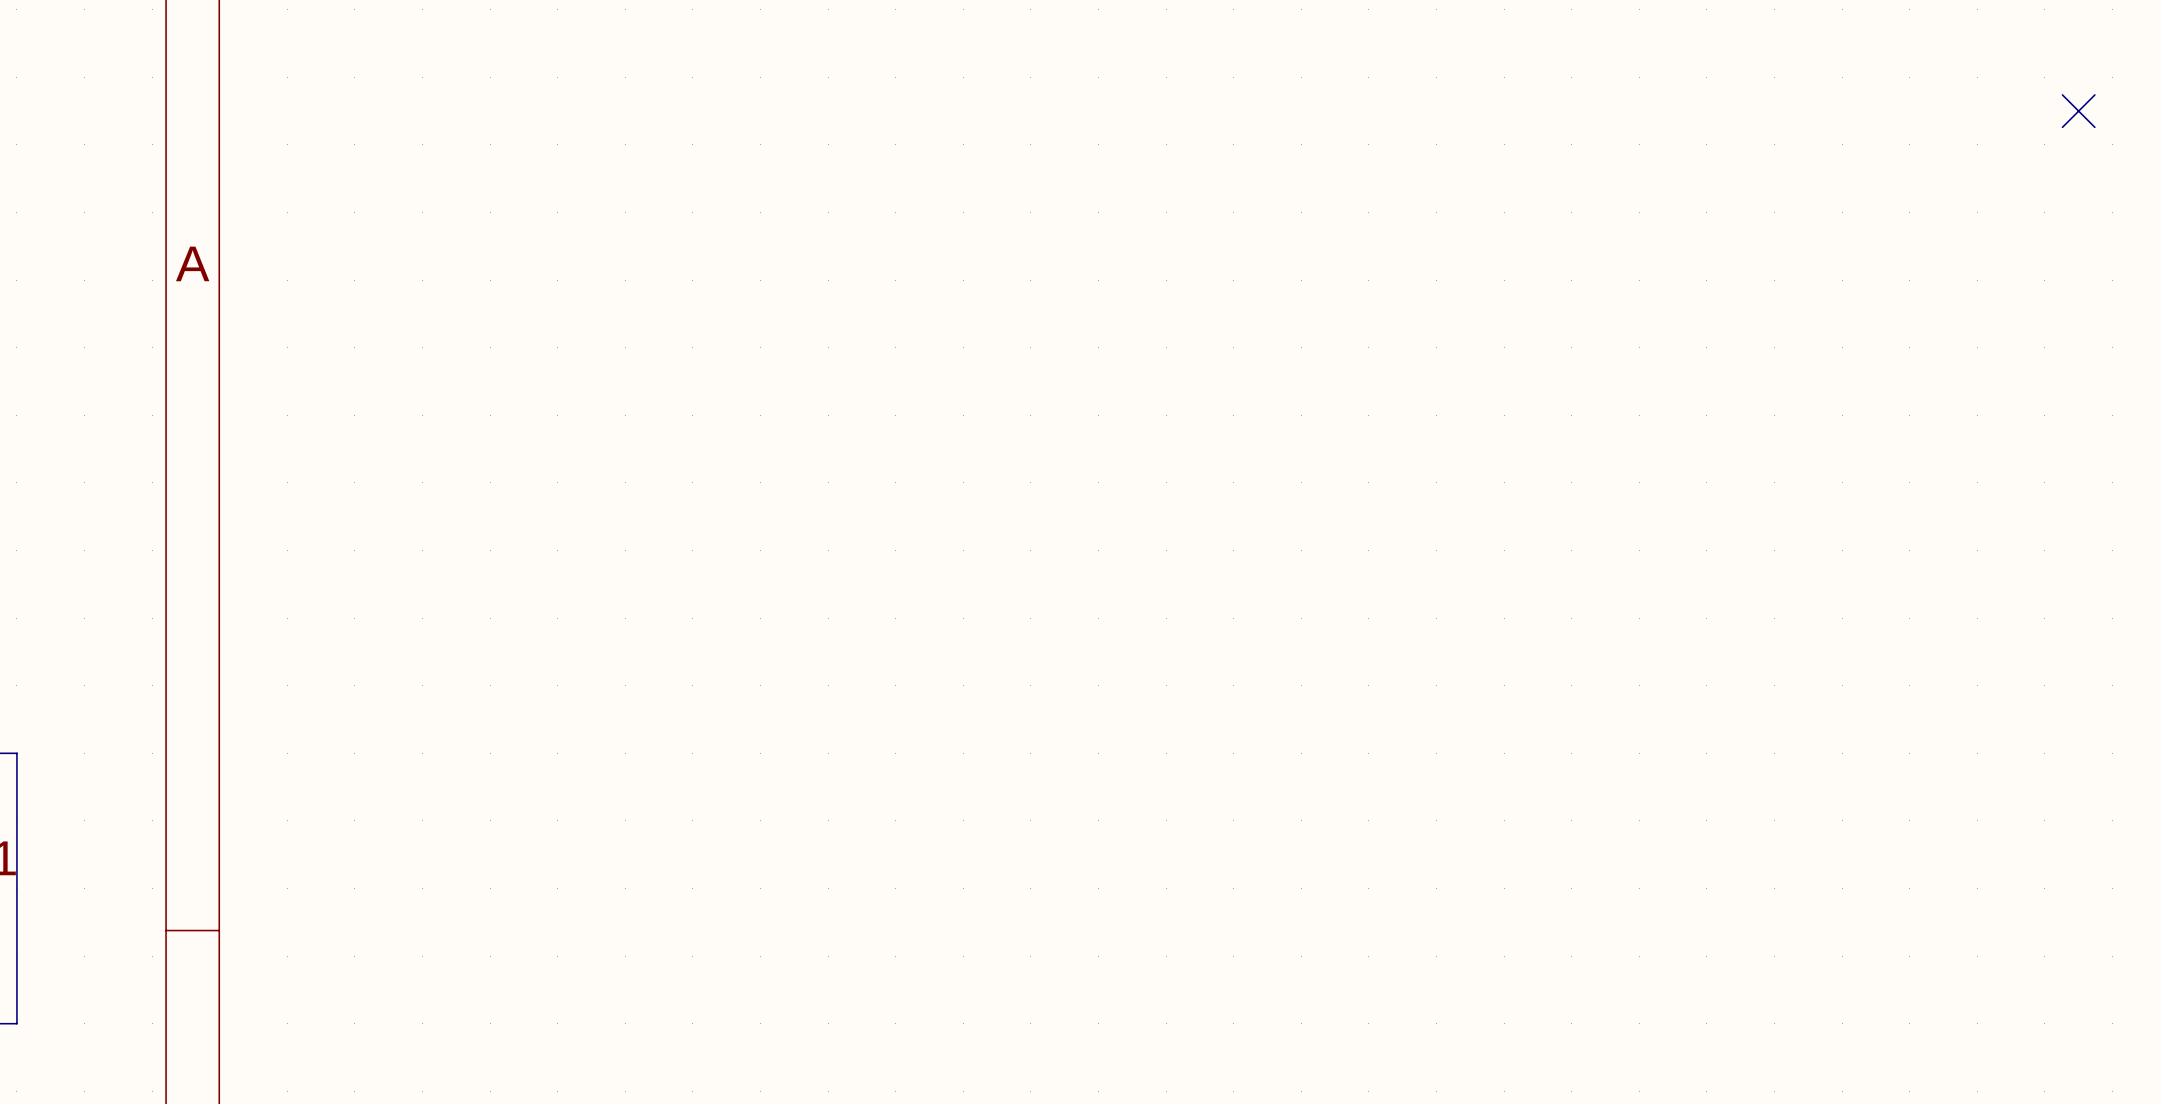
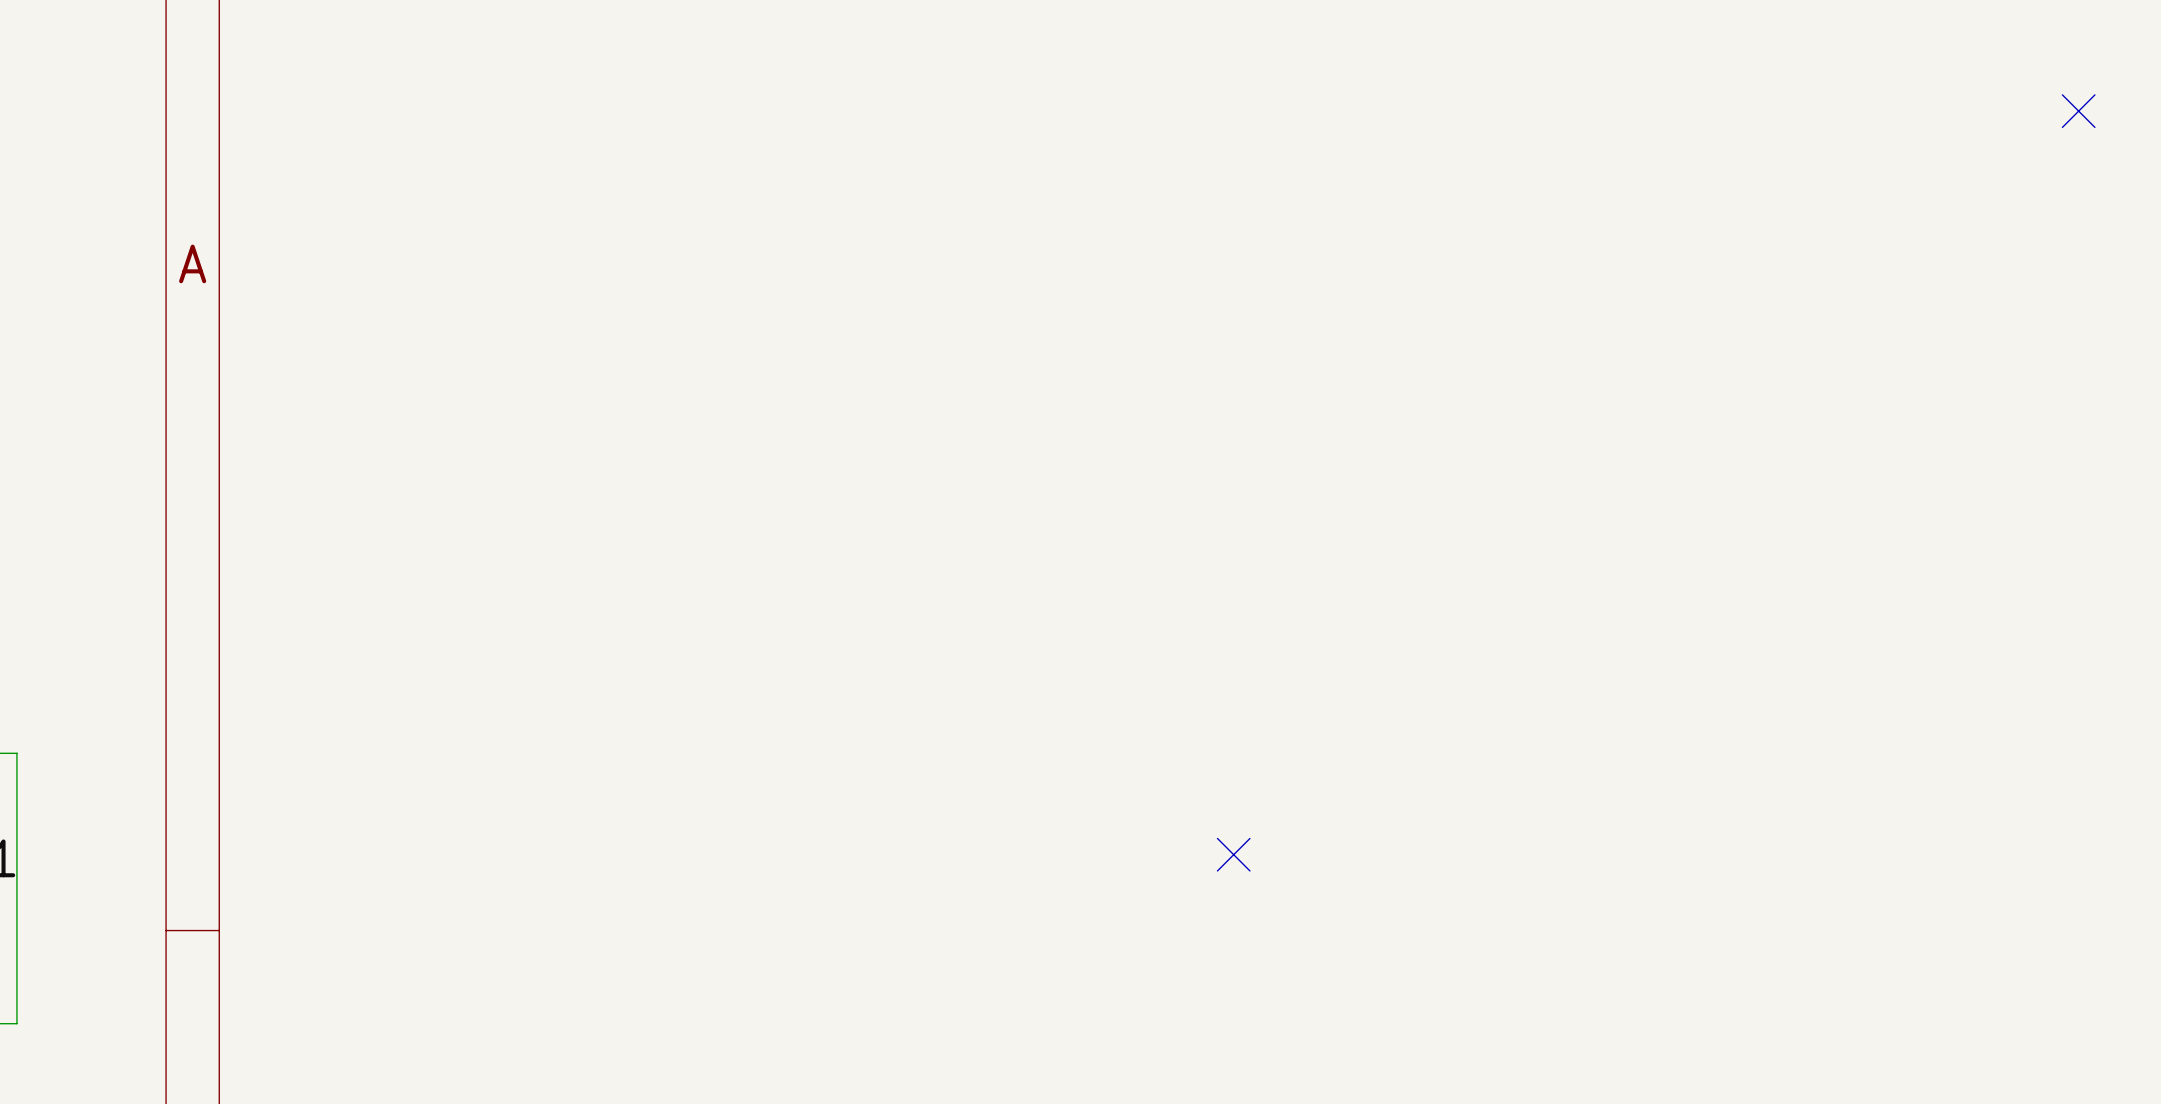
no-connect mark: none -> (1233, 854)

